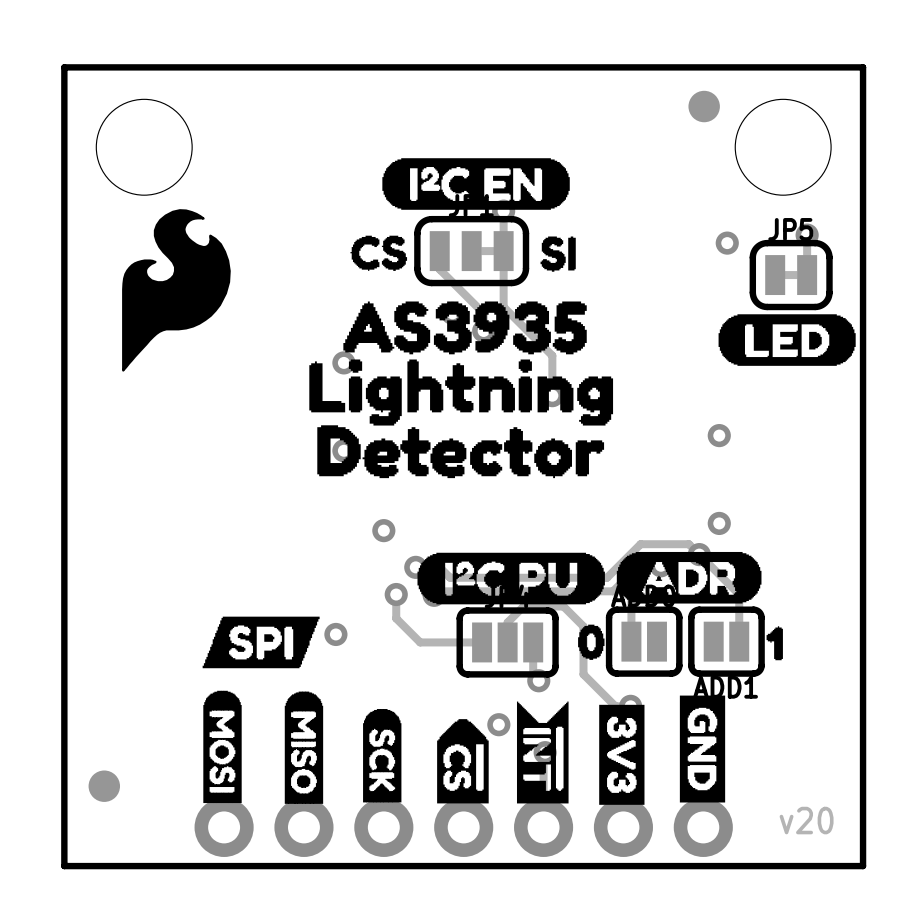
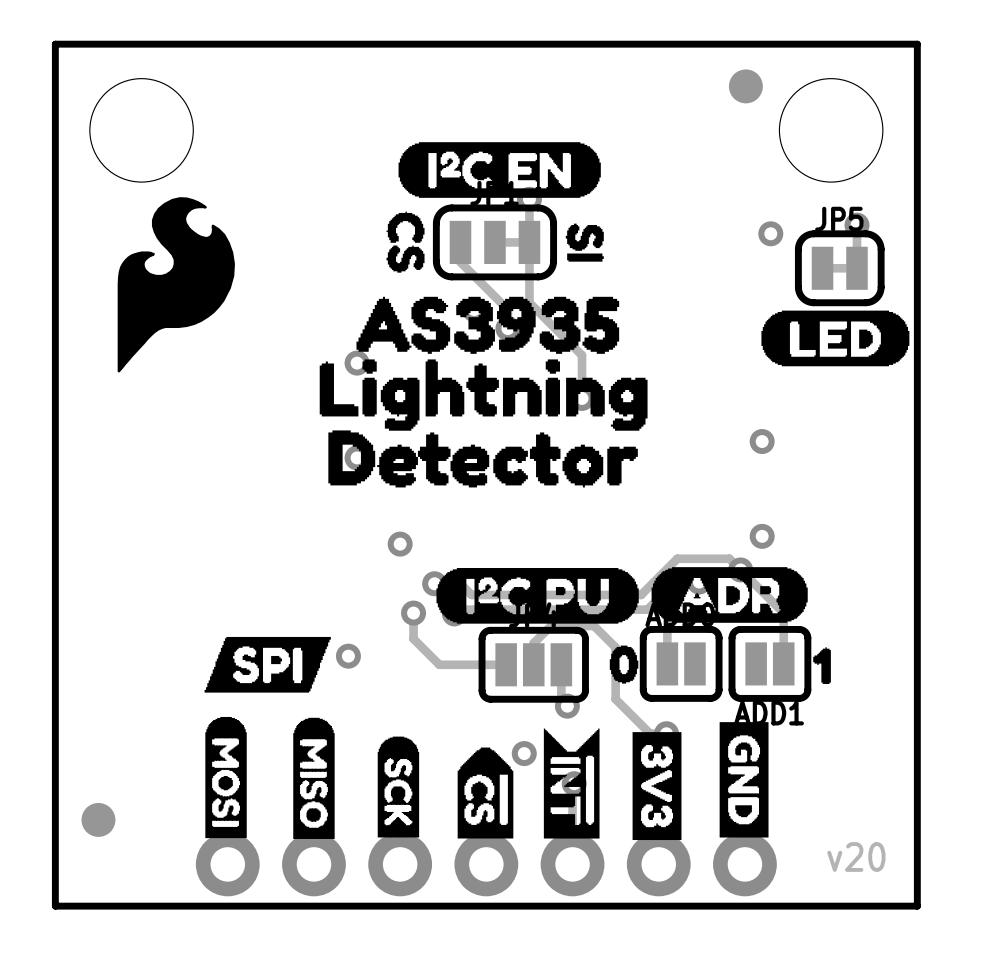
drawing shape: [350, 235, 408, 271] -> [386, 211, 425, 273]
drawing shape: [540, 236, 576, 272] -> [565, 223, 604, 262]

